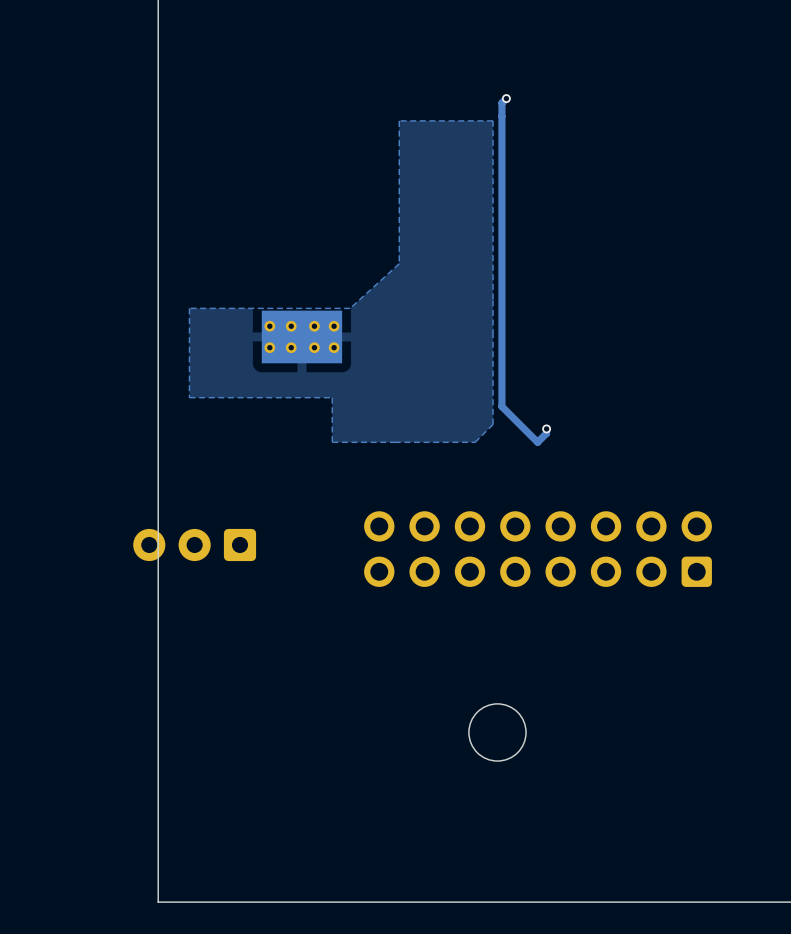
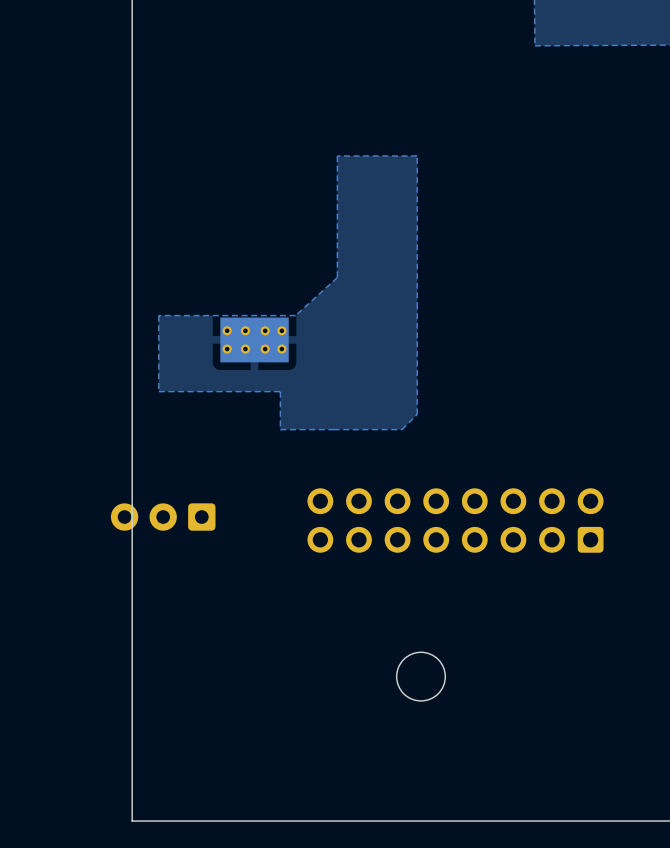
track: (506, 98) (501, 103) (501, 406) (537, 442) (546, 433) (546, 428) -> none
via: (506, 98) -> none
via: (546, 428) -> none

